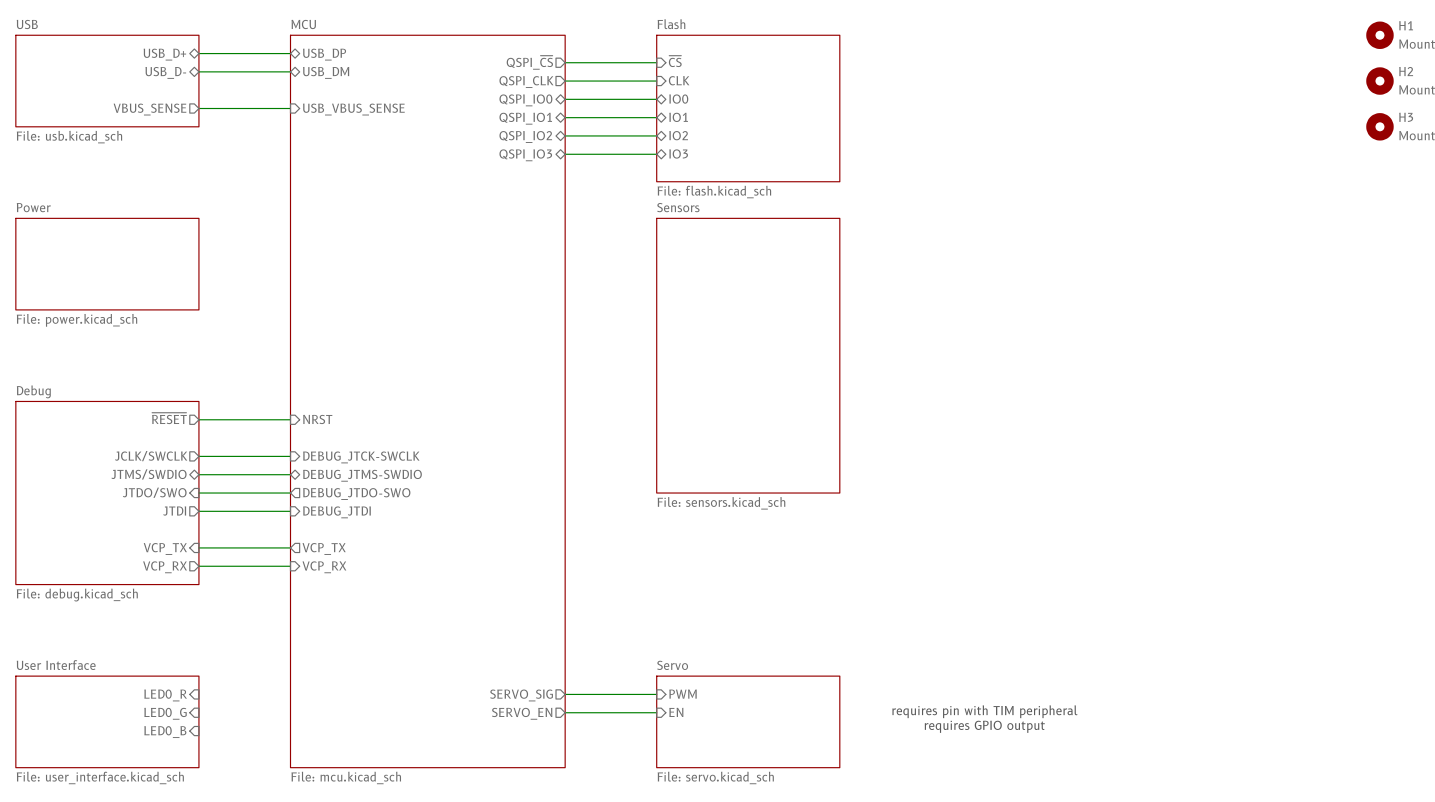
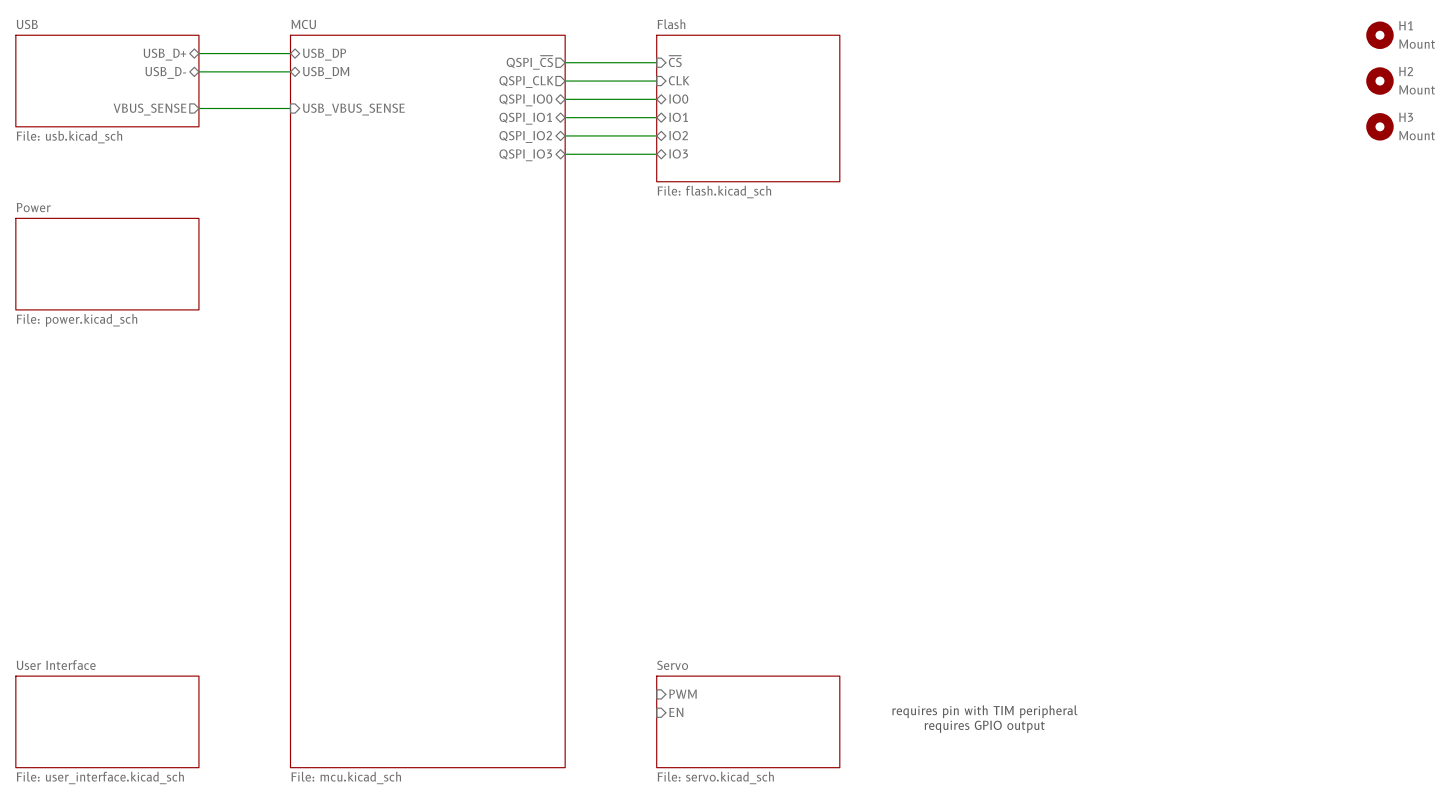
sheet Sensors: File: sensors.kicad_sch (748, 355) -> none
sheet pin: ~{RESET} (169, 418) -> none
wire: (198, 419) (290, 419) -> none
sheet pin: NRST (317, 419) -> none
sheet pin: JCLK/SWCLK (151, 456) -> none
wire: (198, 456) (290, 456) -> none
sheet pin: DEBUG_JTCK-SWCLK (361, 457) -> none
sheet pin: JTMS/SWDIO (149, 474) -> none
wire: (198, 474) (290, 474) -> none
sheet pin: DEBUG_JTMS-SWDIO (362, 475) -> none
sheet pin: JTDO/SWO (154, 492) -> none
sheet Debug: File: debug.kicad_sch (107, 493) -> none
wire: (198, 493) (290, 493) -> none
sheet pin: DEBUG_JTDO-SWO (356, 494) -> none
sheet pin: JTDI (174, 511) -> none
wire: (198, 511) (290, 511) -> none
sheet pin: DEBUG_JTDI (336, 512) -> none
wire: (198, 547) (290, 547) -> none
sheet pin: VCP_TX (165, 548) -> none
sheet pin: VCP_TX (324, 548) -> none
wire: (198, 566) (290, 566) -> none
sheet pin: VCP_RX (165, 567) -> none
sheet pin: VCP_RX (324, 567) -> none
wire: (565, 694) (656, 694) -> none
sheet pin: LED0_R (165, 695) -> none
sheet pin: SERVO_SIG (521, 695) -> none
wire: (565, 712) (656, 712) -> none
sheet pin: LED0_G (165, 713) -> none
sheet pin: SERVO_EN (522, 713) -> none
sheet pin: LED0_B (165, 732) -> none

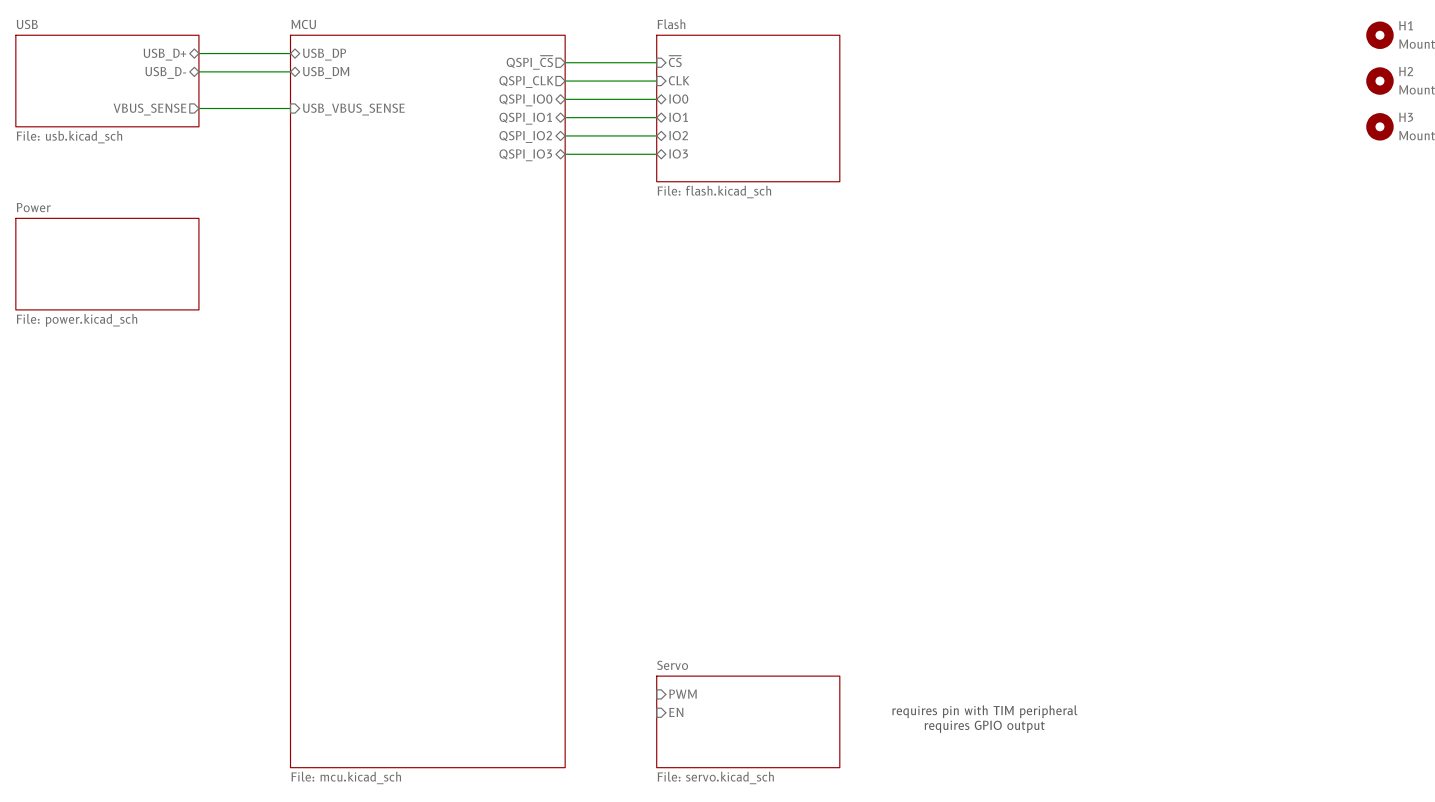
sheet User Interface: File: user_interface.kicad_sch (107, 721) -> none

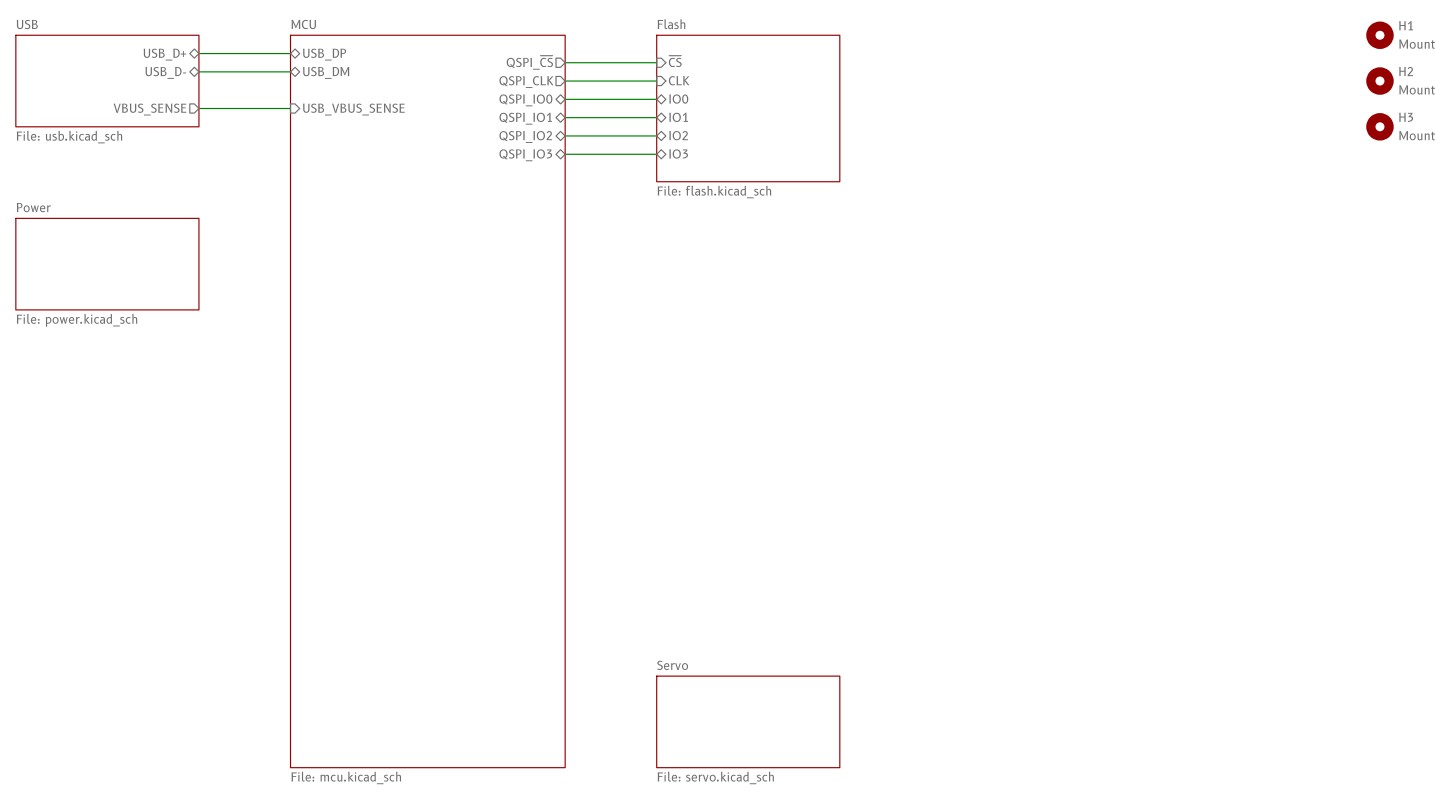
sheet pin: PWM (682, 694) -> none
text: requires pin with TIM peripheral (984, 711) -> none
sheet pin: EN (676, 712) -> none
text: requires GPIO output (984, 726) -> none

